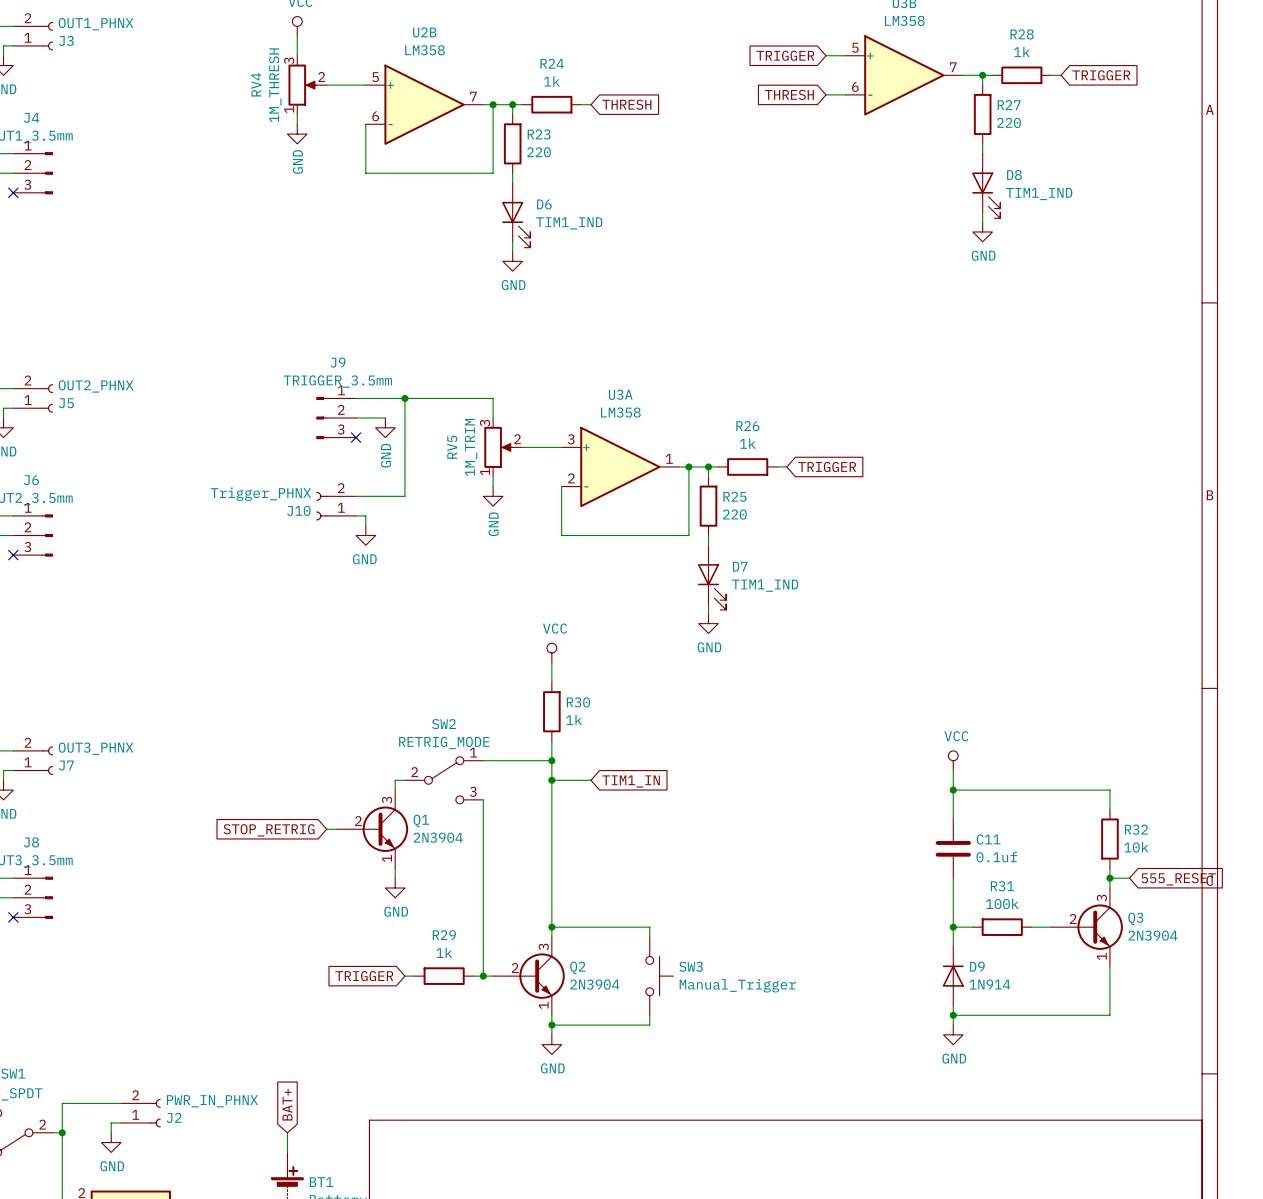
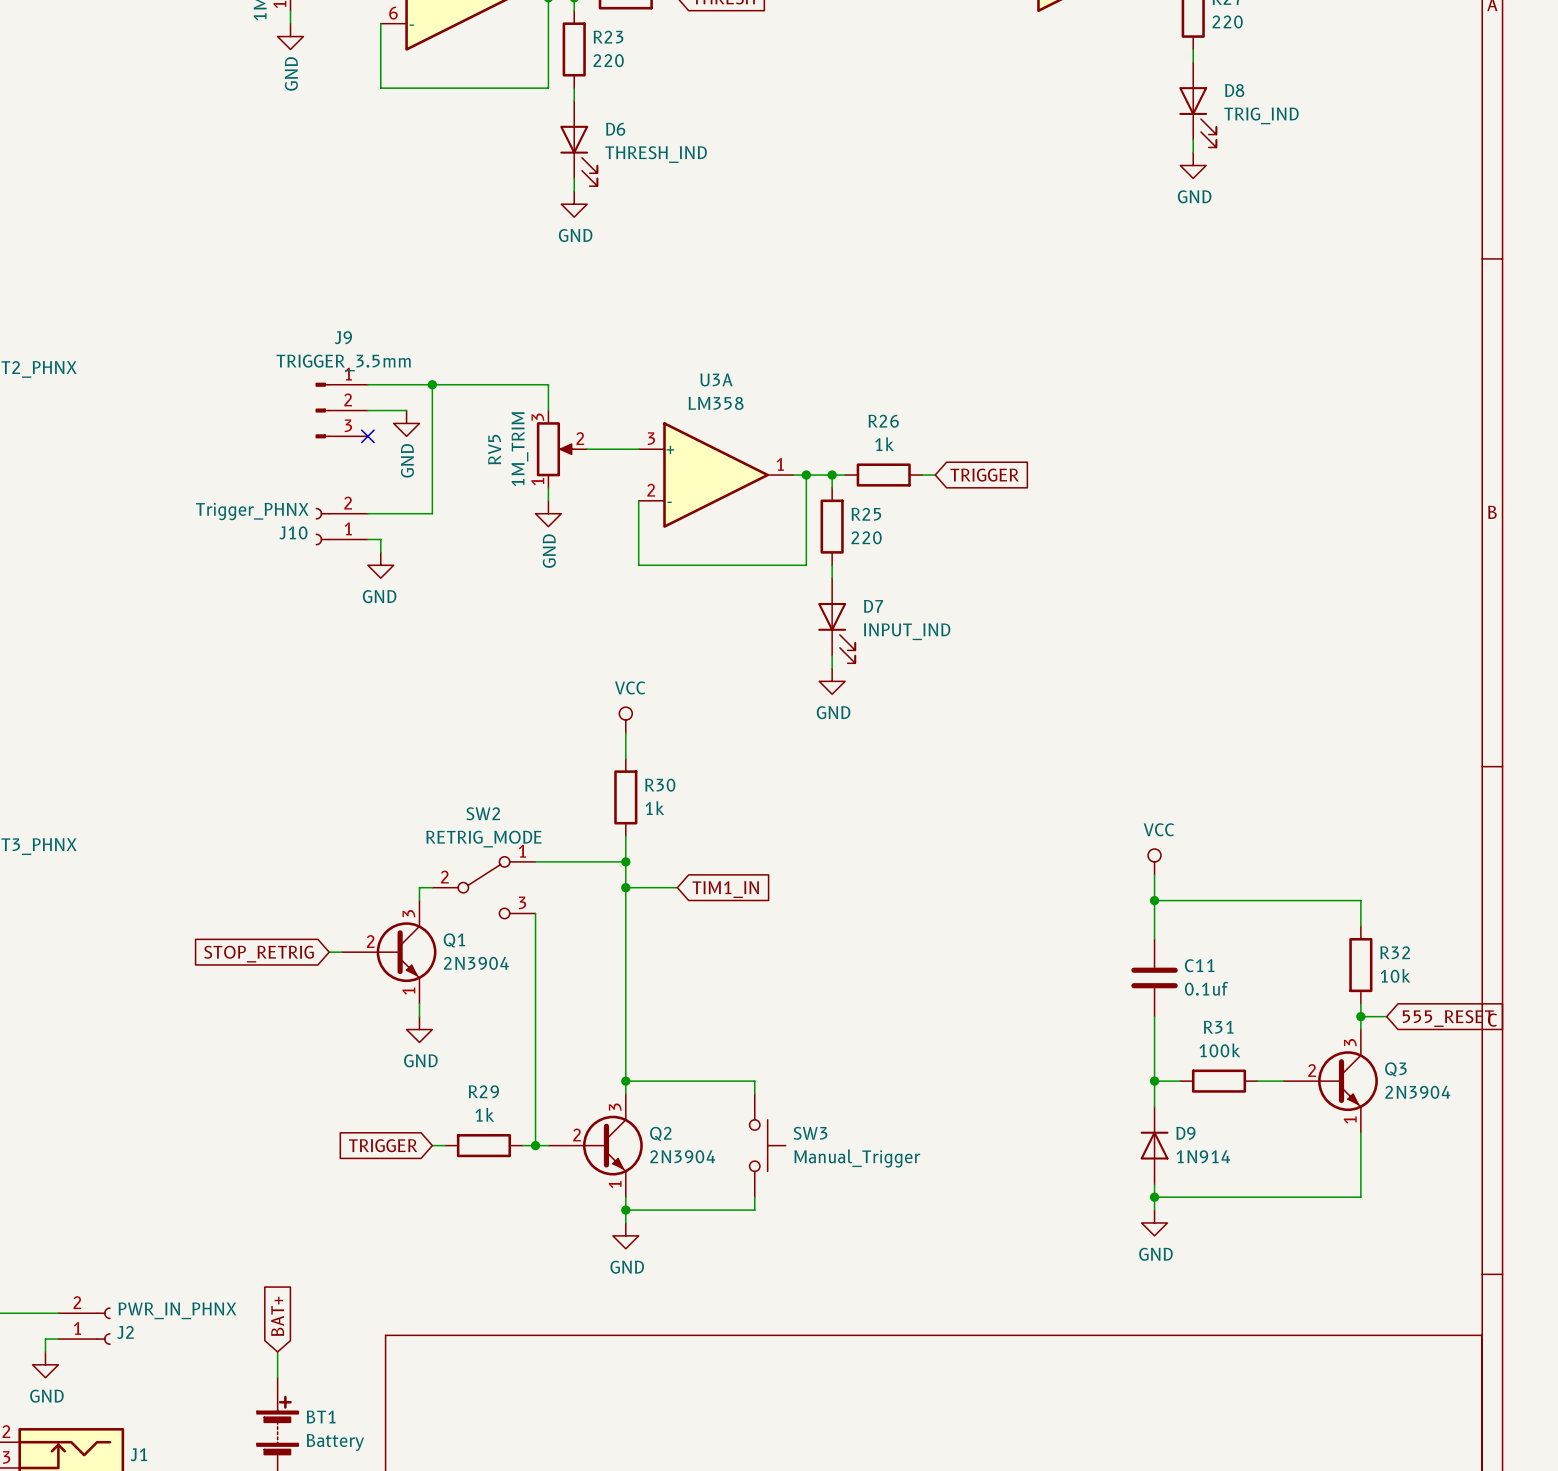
D8 value: TIM1_IND (1039, 194) -> TRIG_IND (1261, 115)
D6 value: TIM1_IND (569, 223) -> THRESH_IND (656, 154)
D7 value: TIM1_IND (765, 585) -> INPUT_IND (907, 631)

